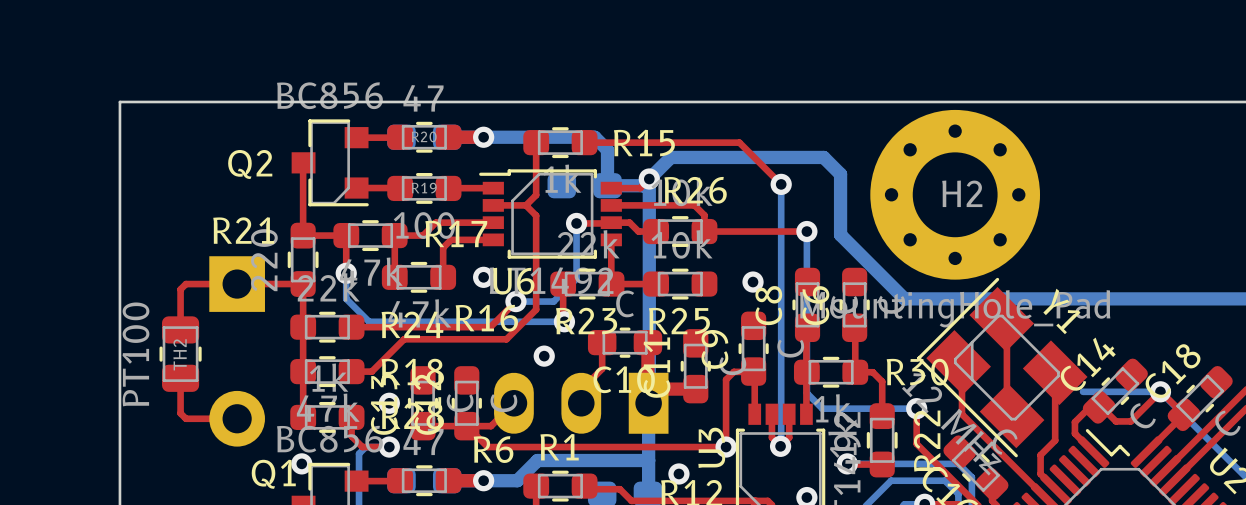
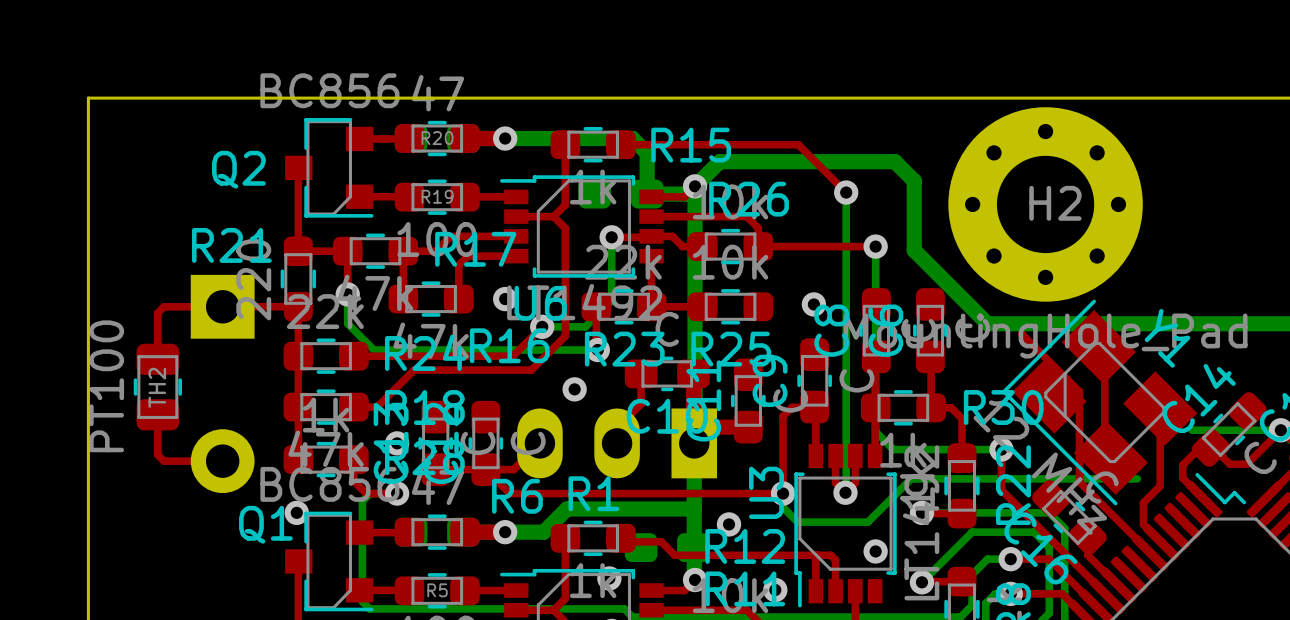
top track: (962, 372) (962, 414) (984, 436) -> (1021, 334) (1079, 391) (1079, 481)
bottom track: none -> (1137, 478) (911, 478) (867, 522) (797, 522) (783, 507) (783, 493)

